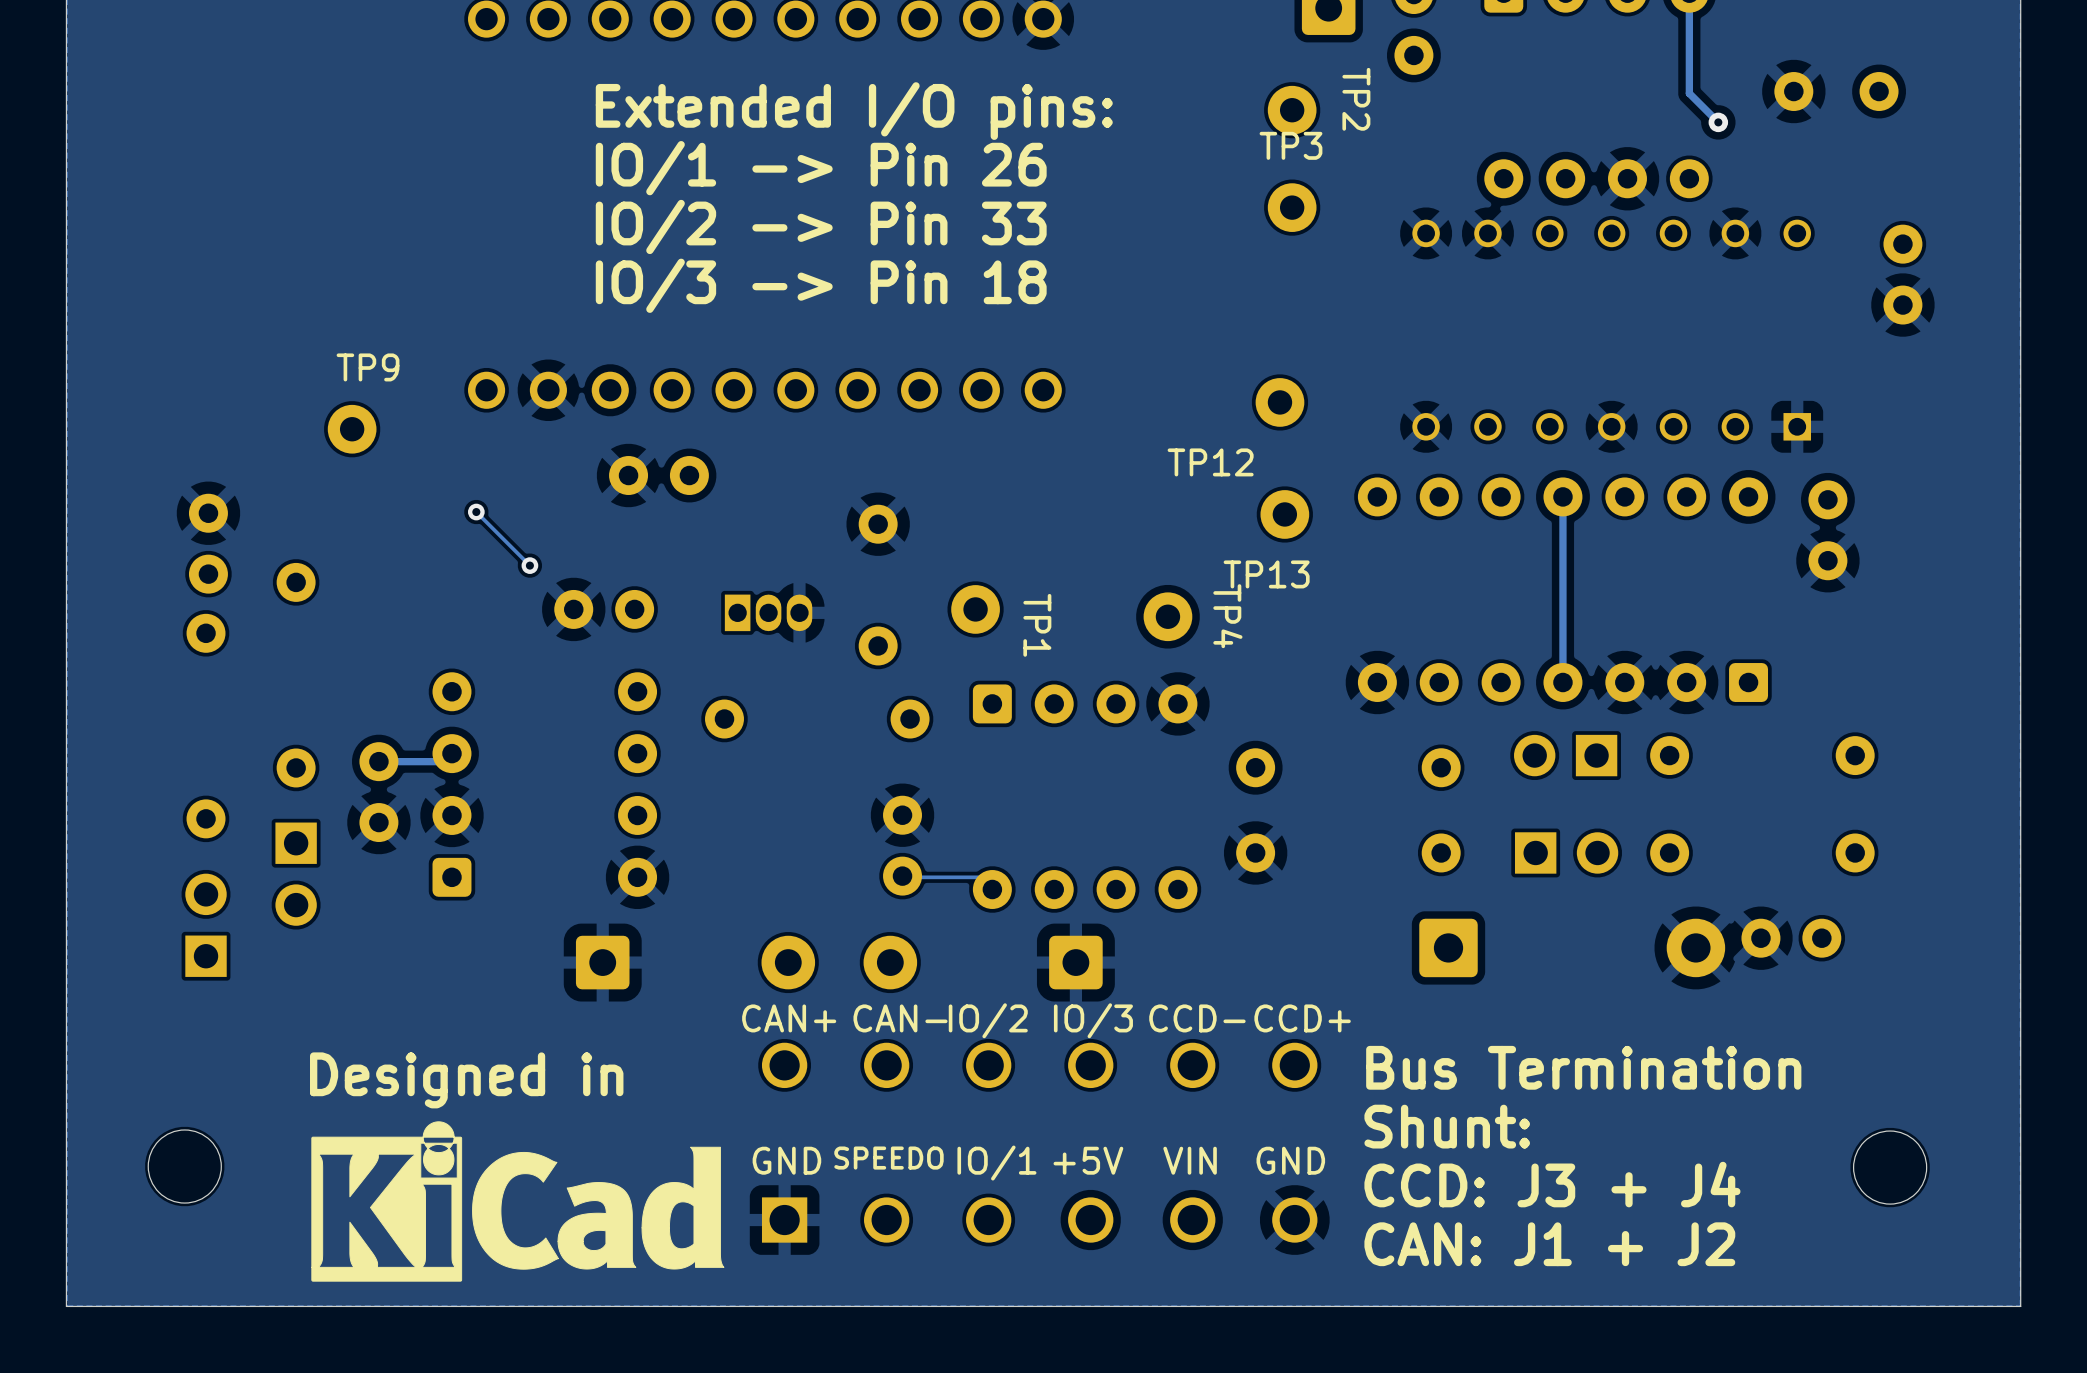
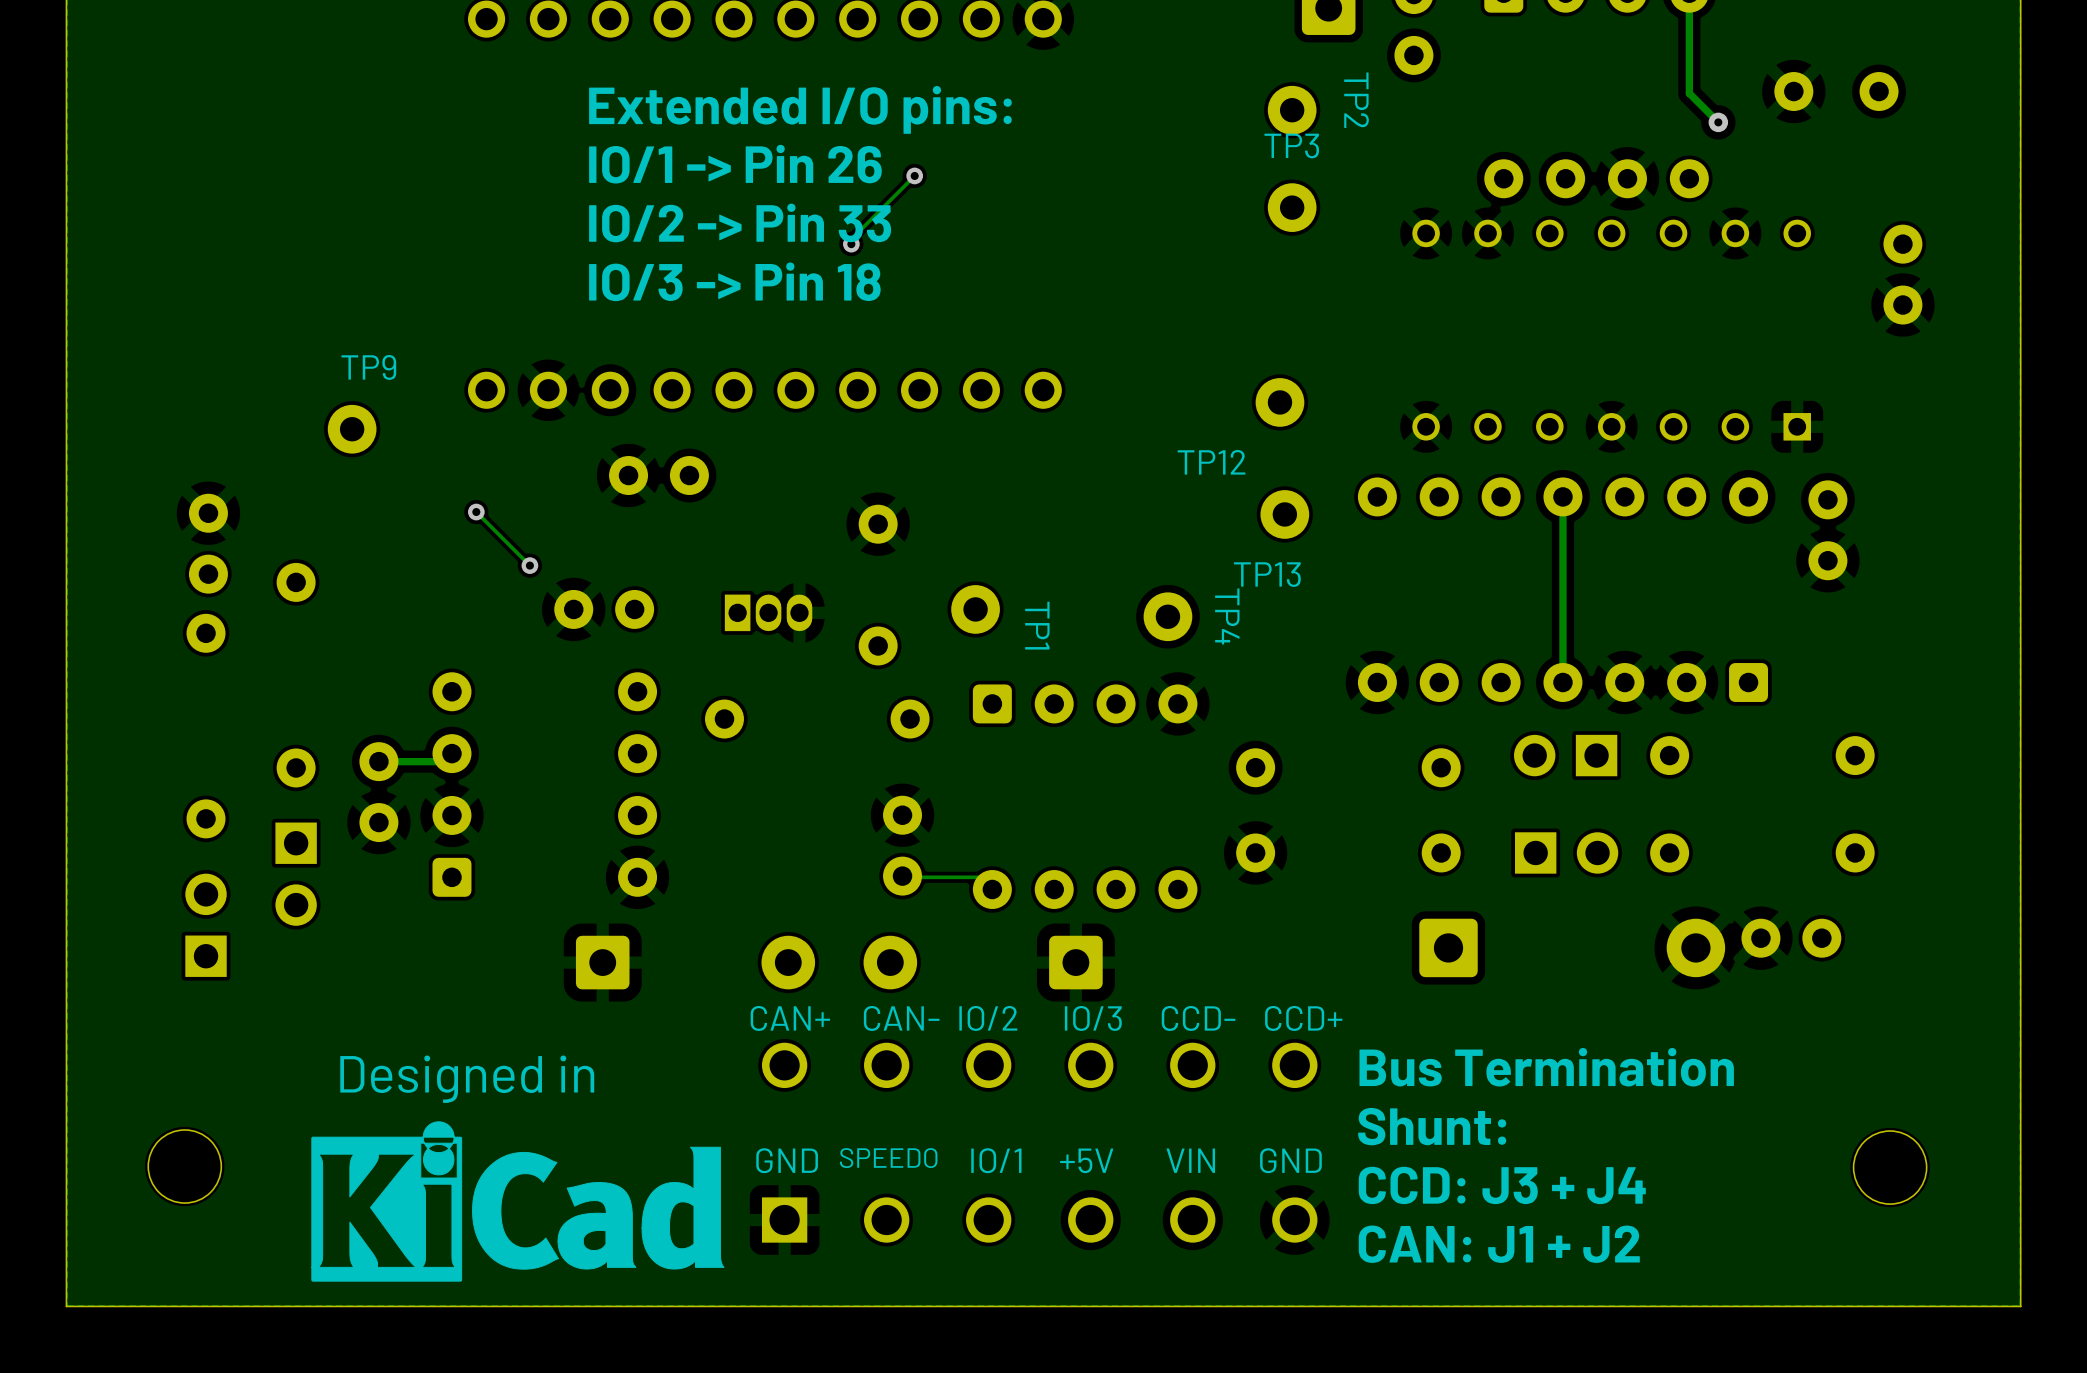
track: none -> (914, 175) (851, 239) (851, 244)
via: none -> (914, 175)
via: none -> (851, 244)

